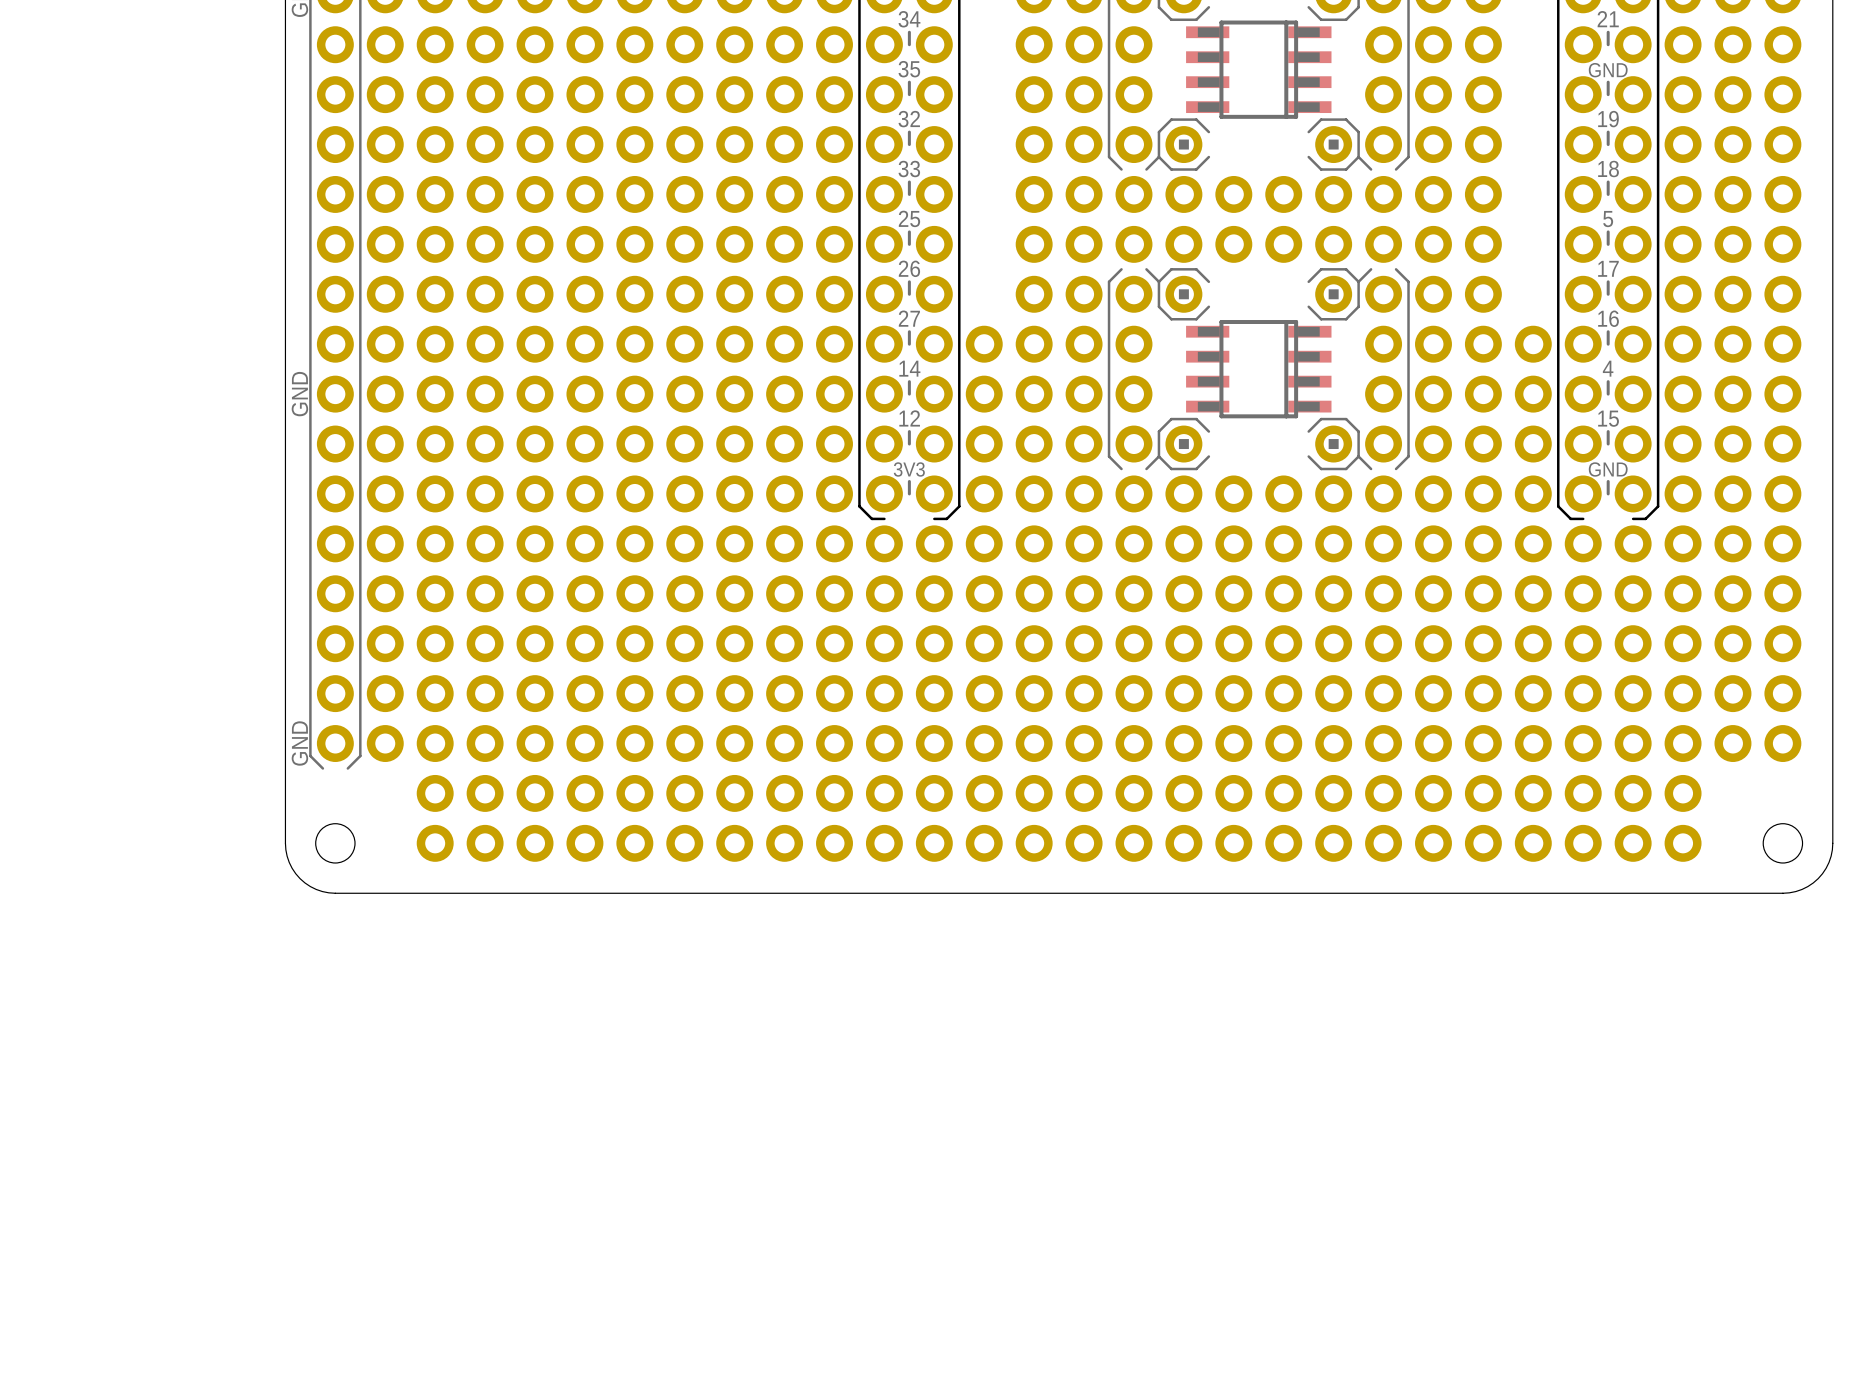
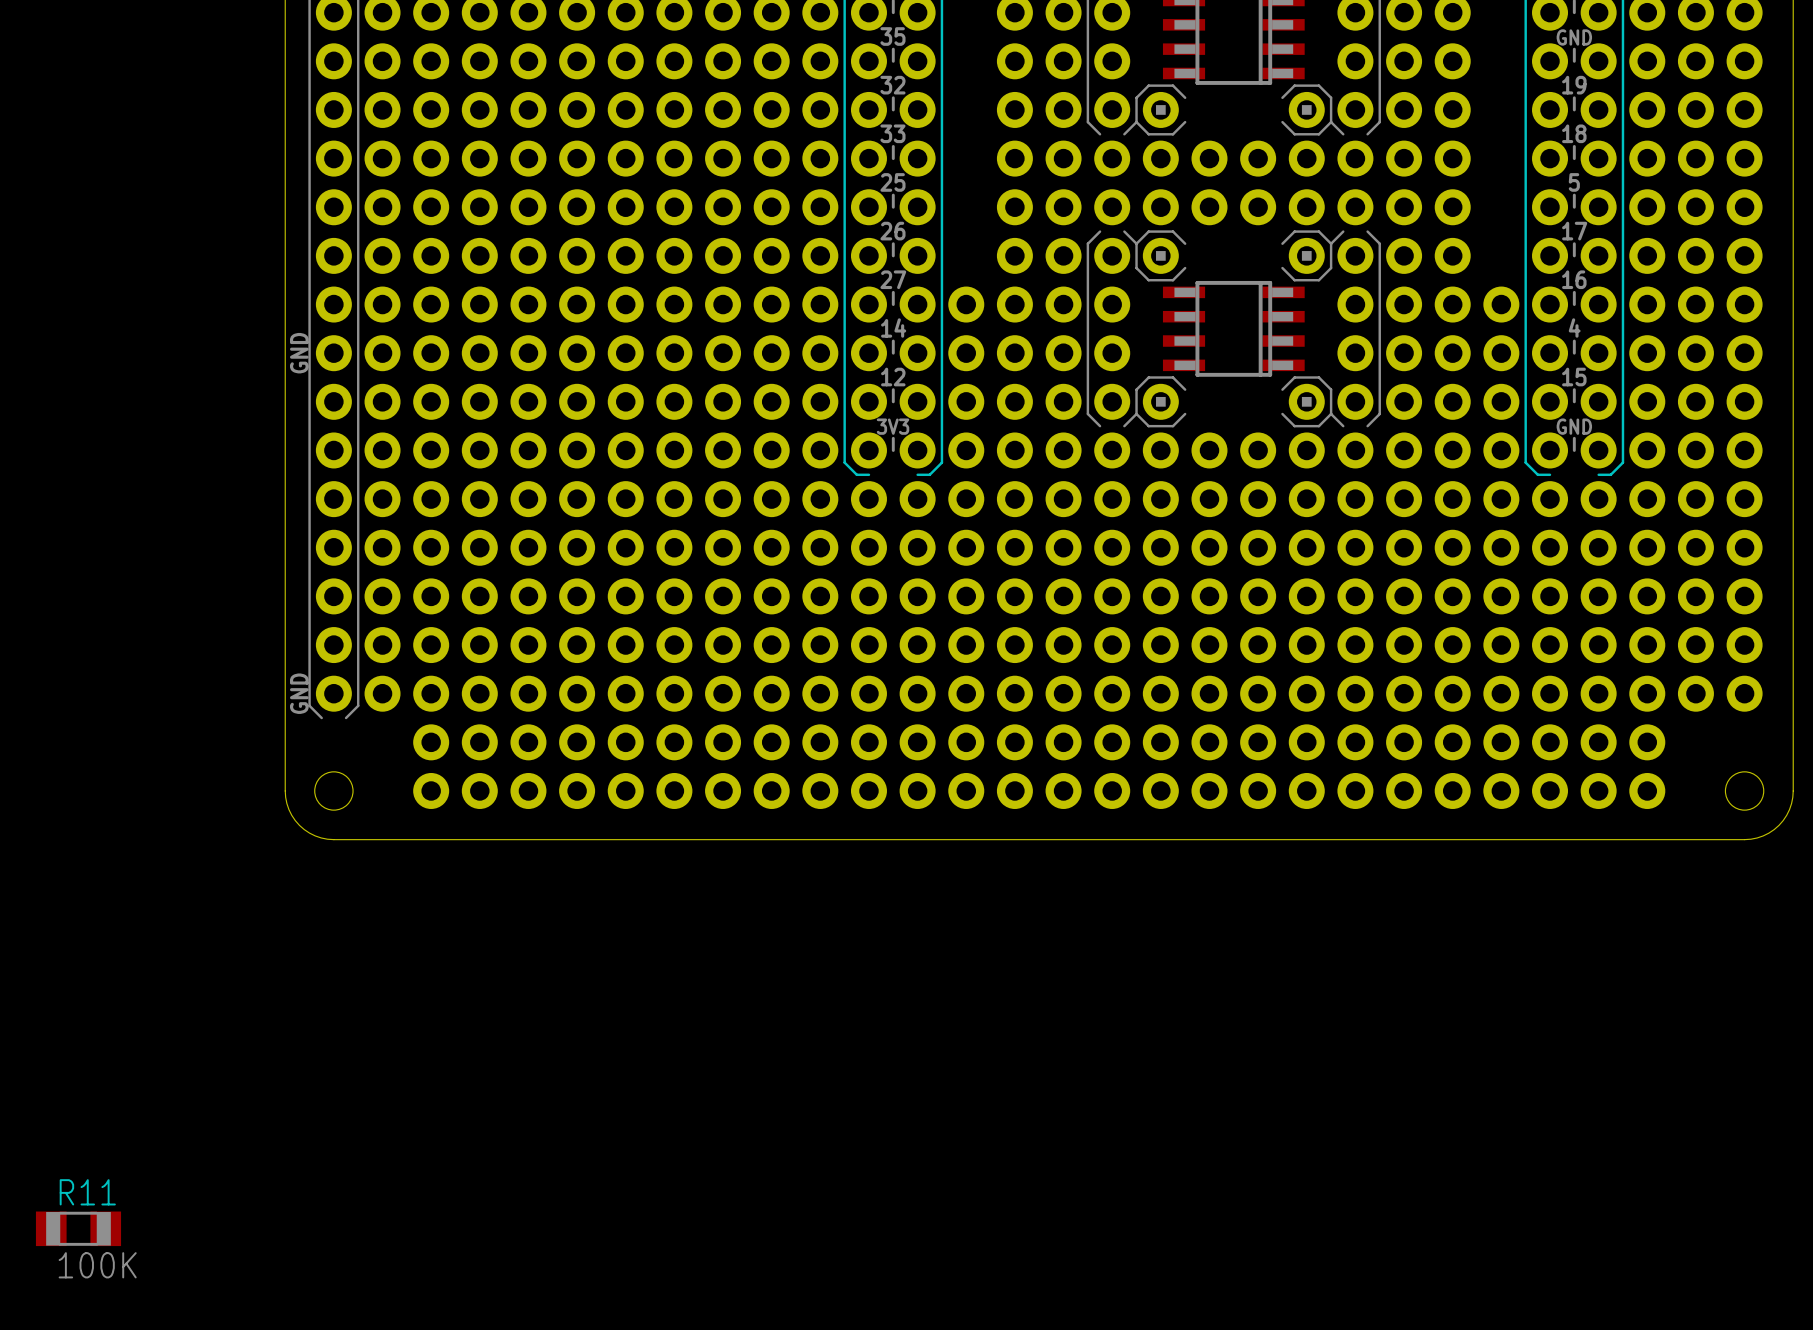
R11: none -> 100K (78, 1228)

